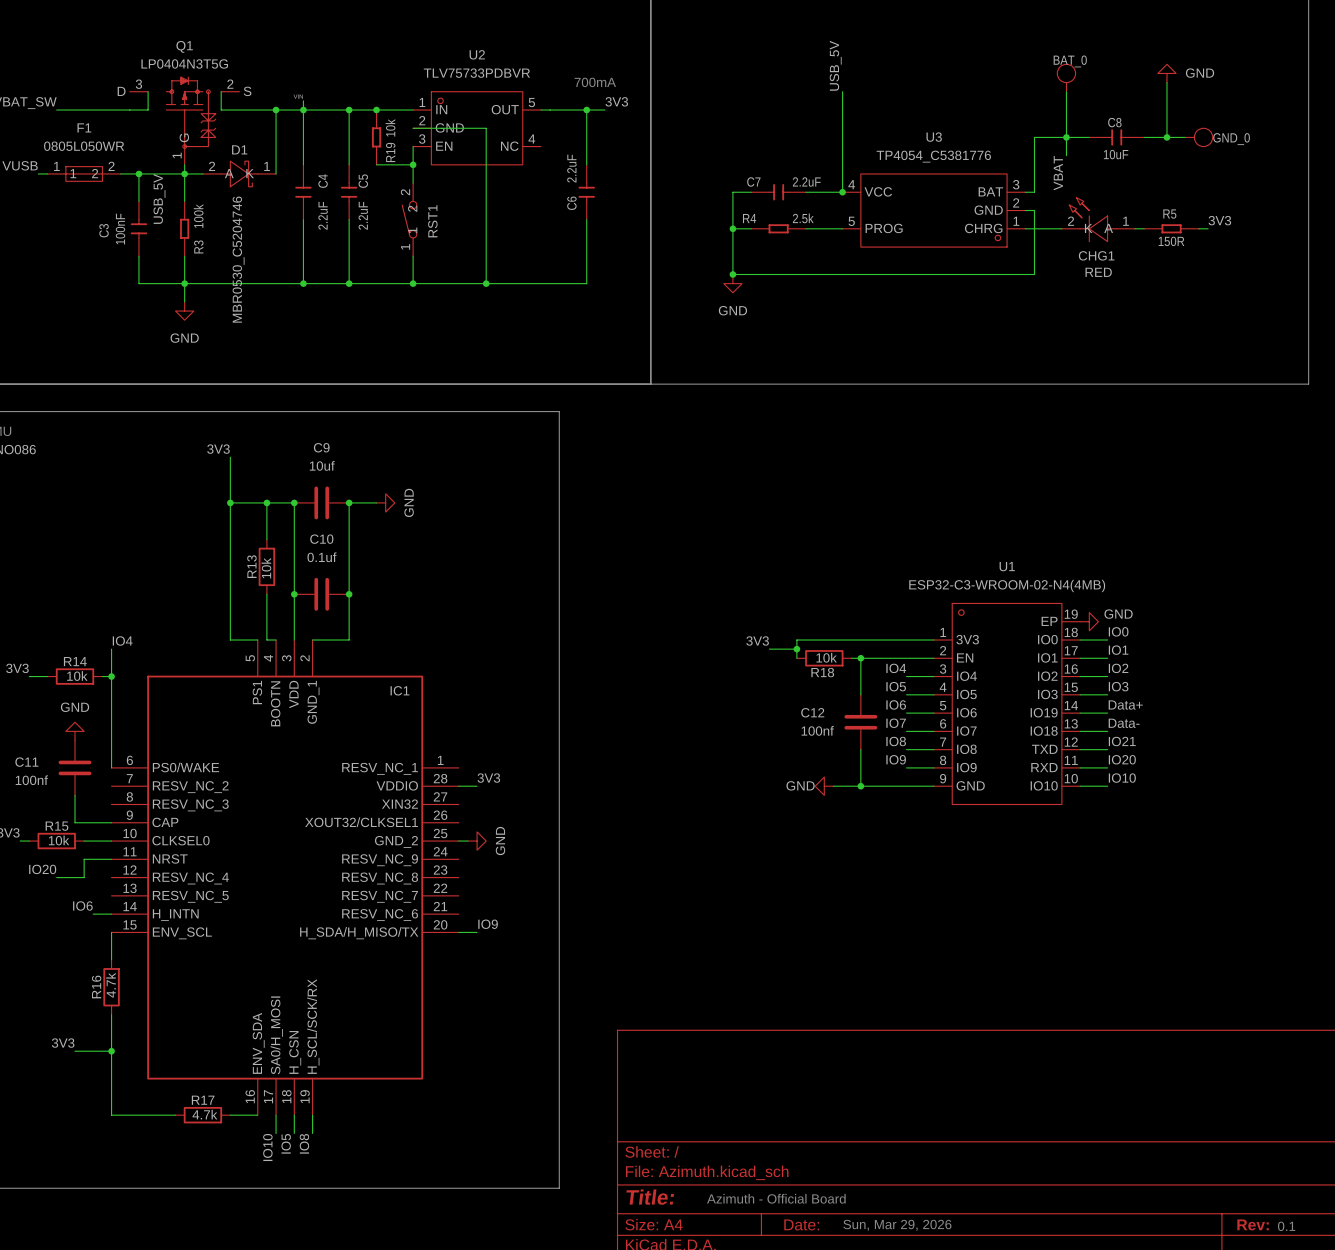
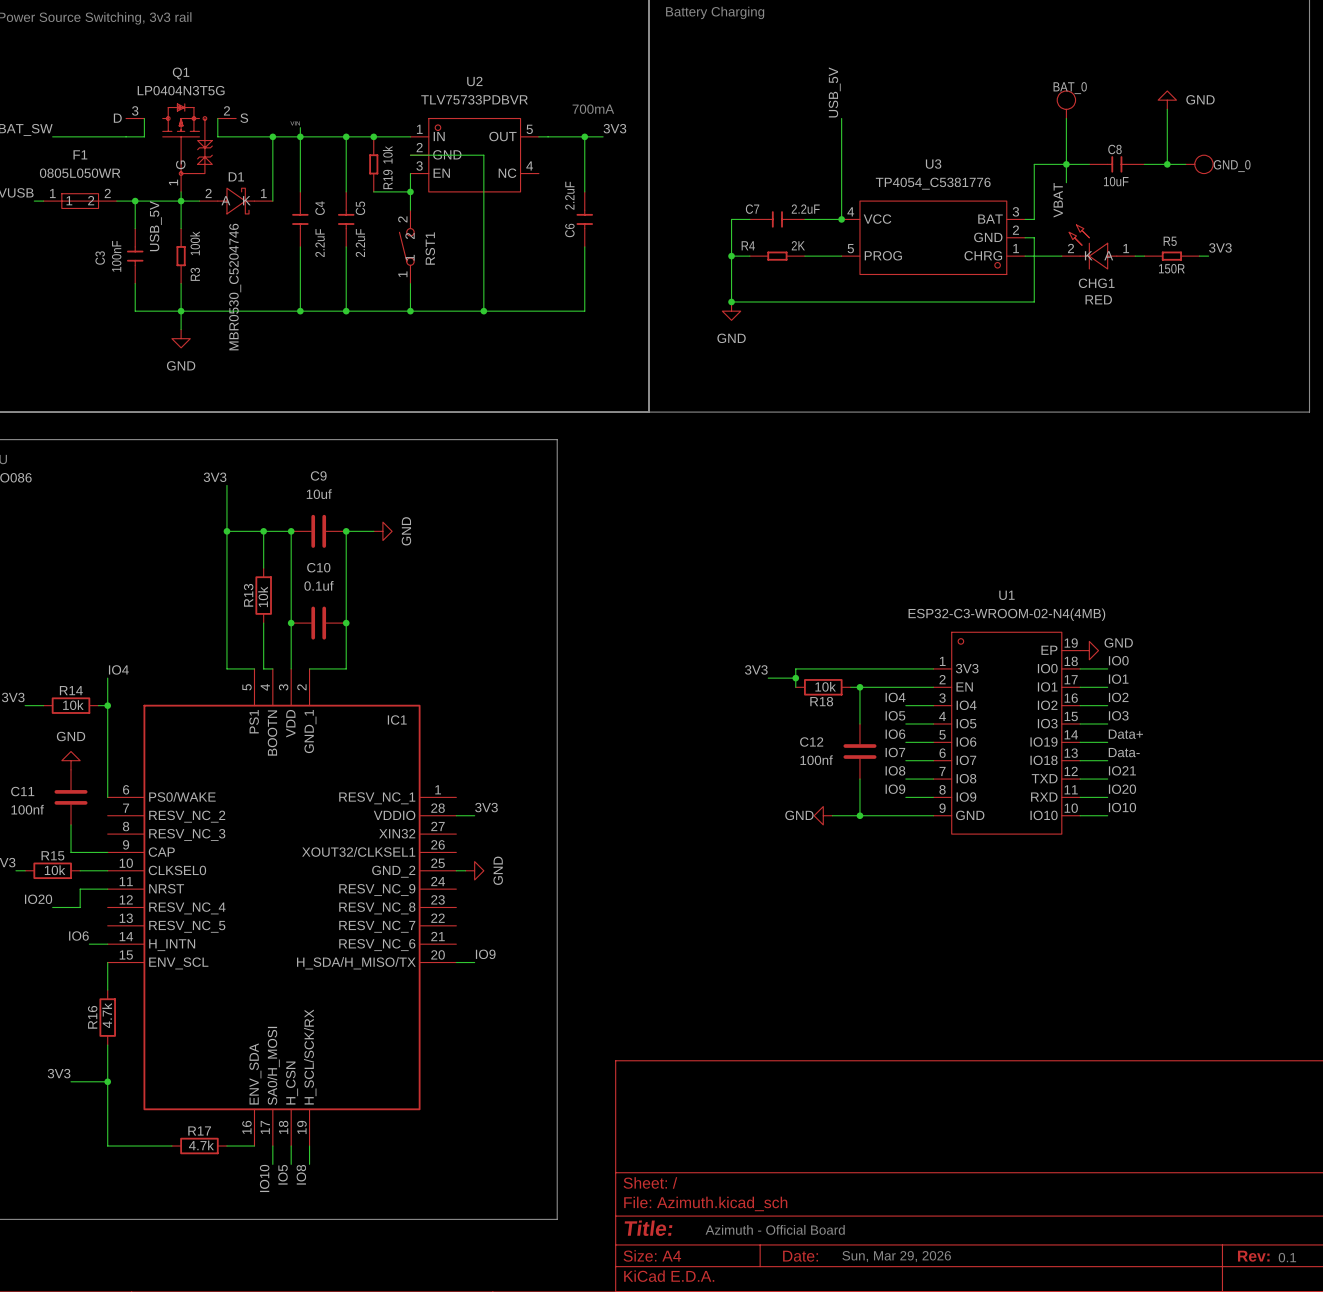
R4 value: 2.5k (803, 218) -> 2K (798, 245)

